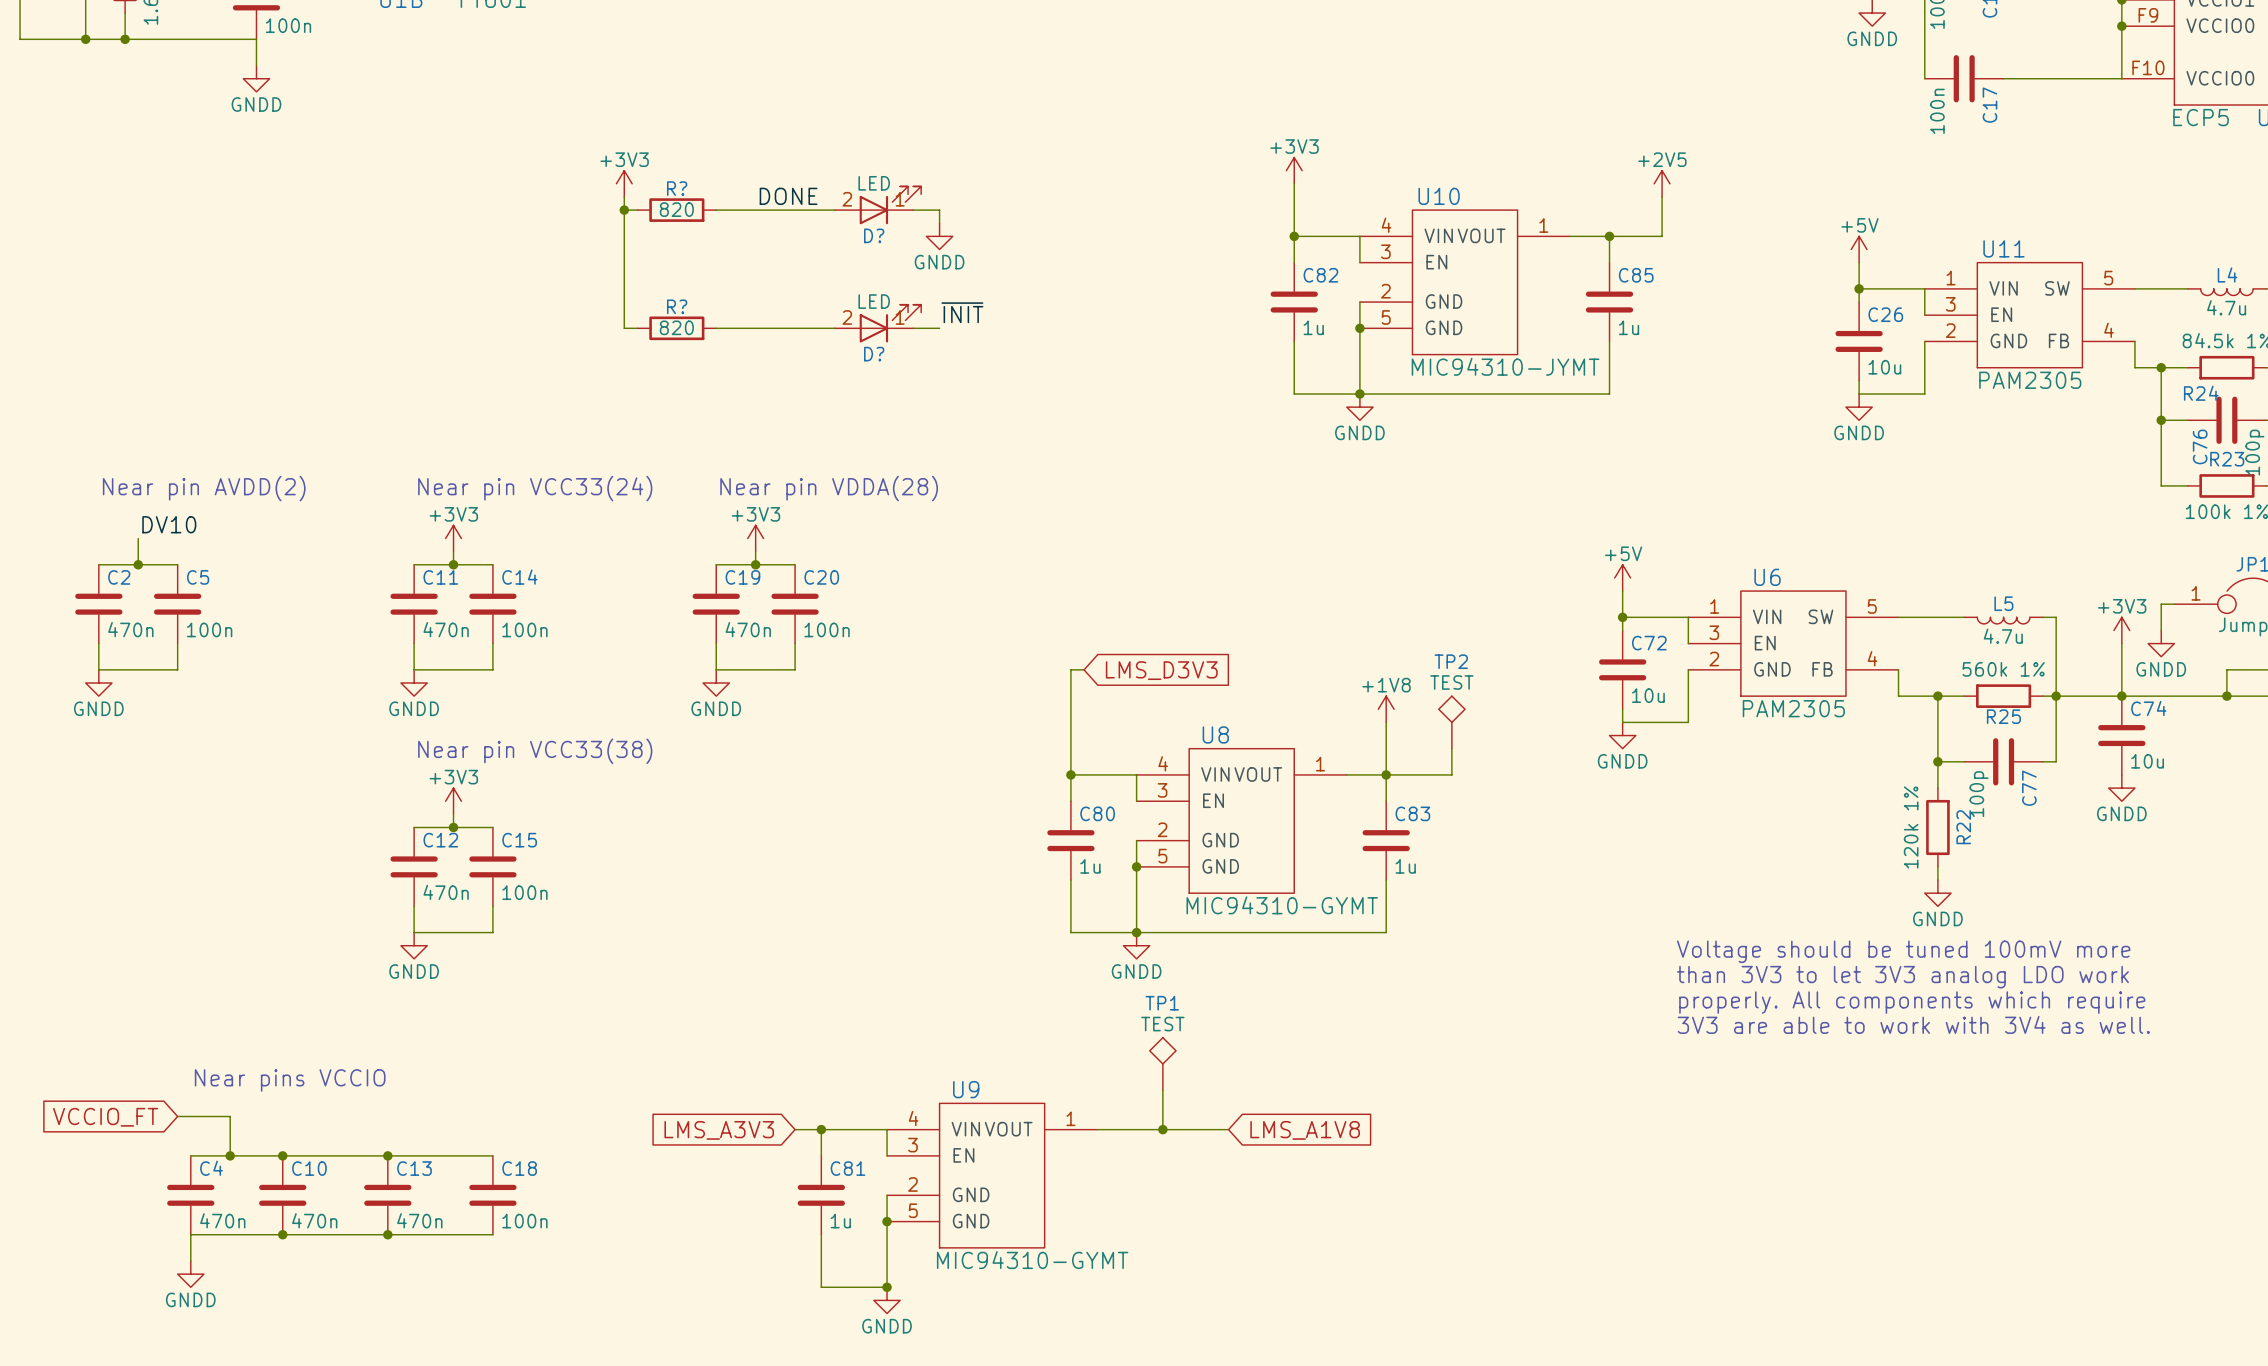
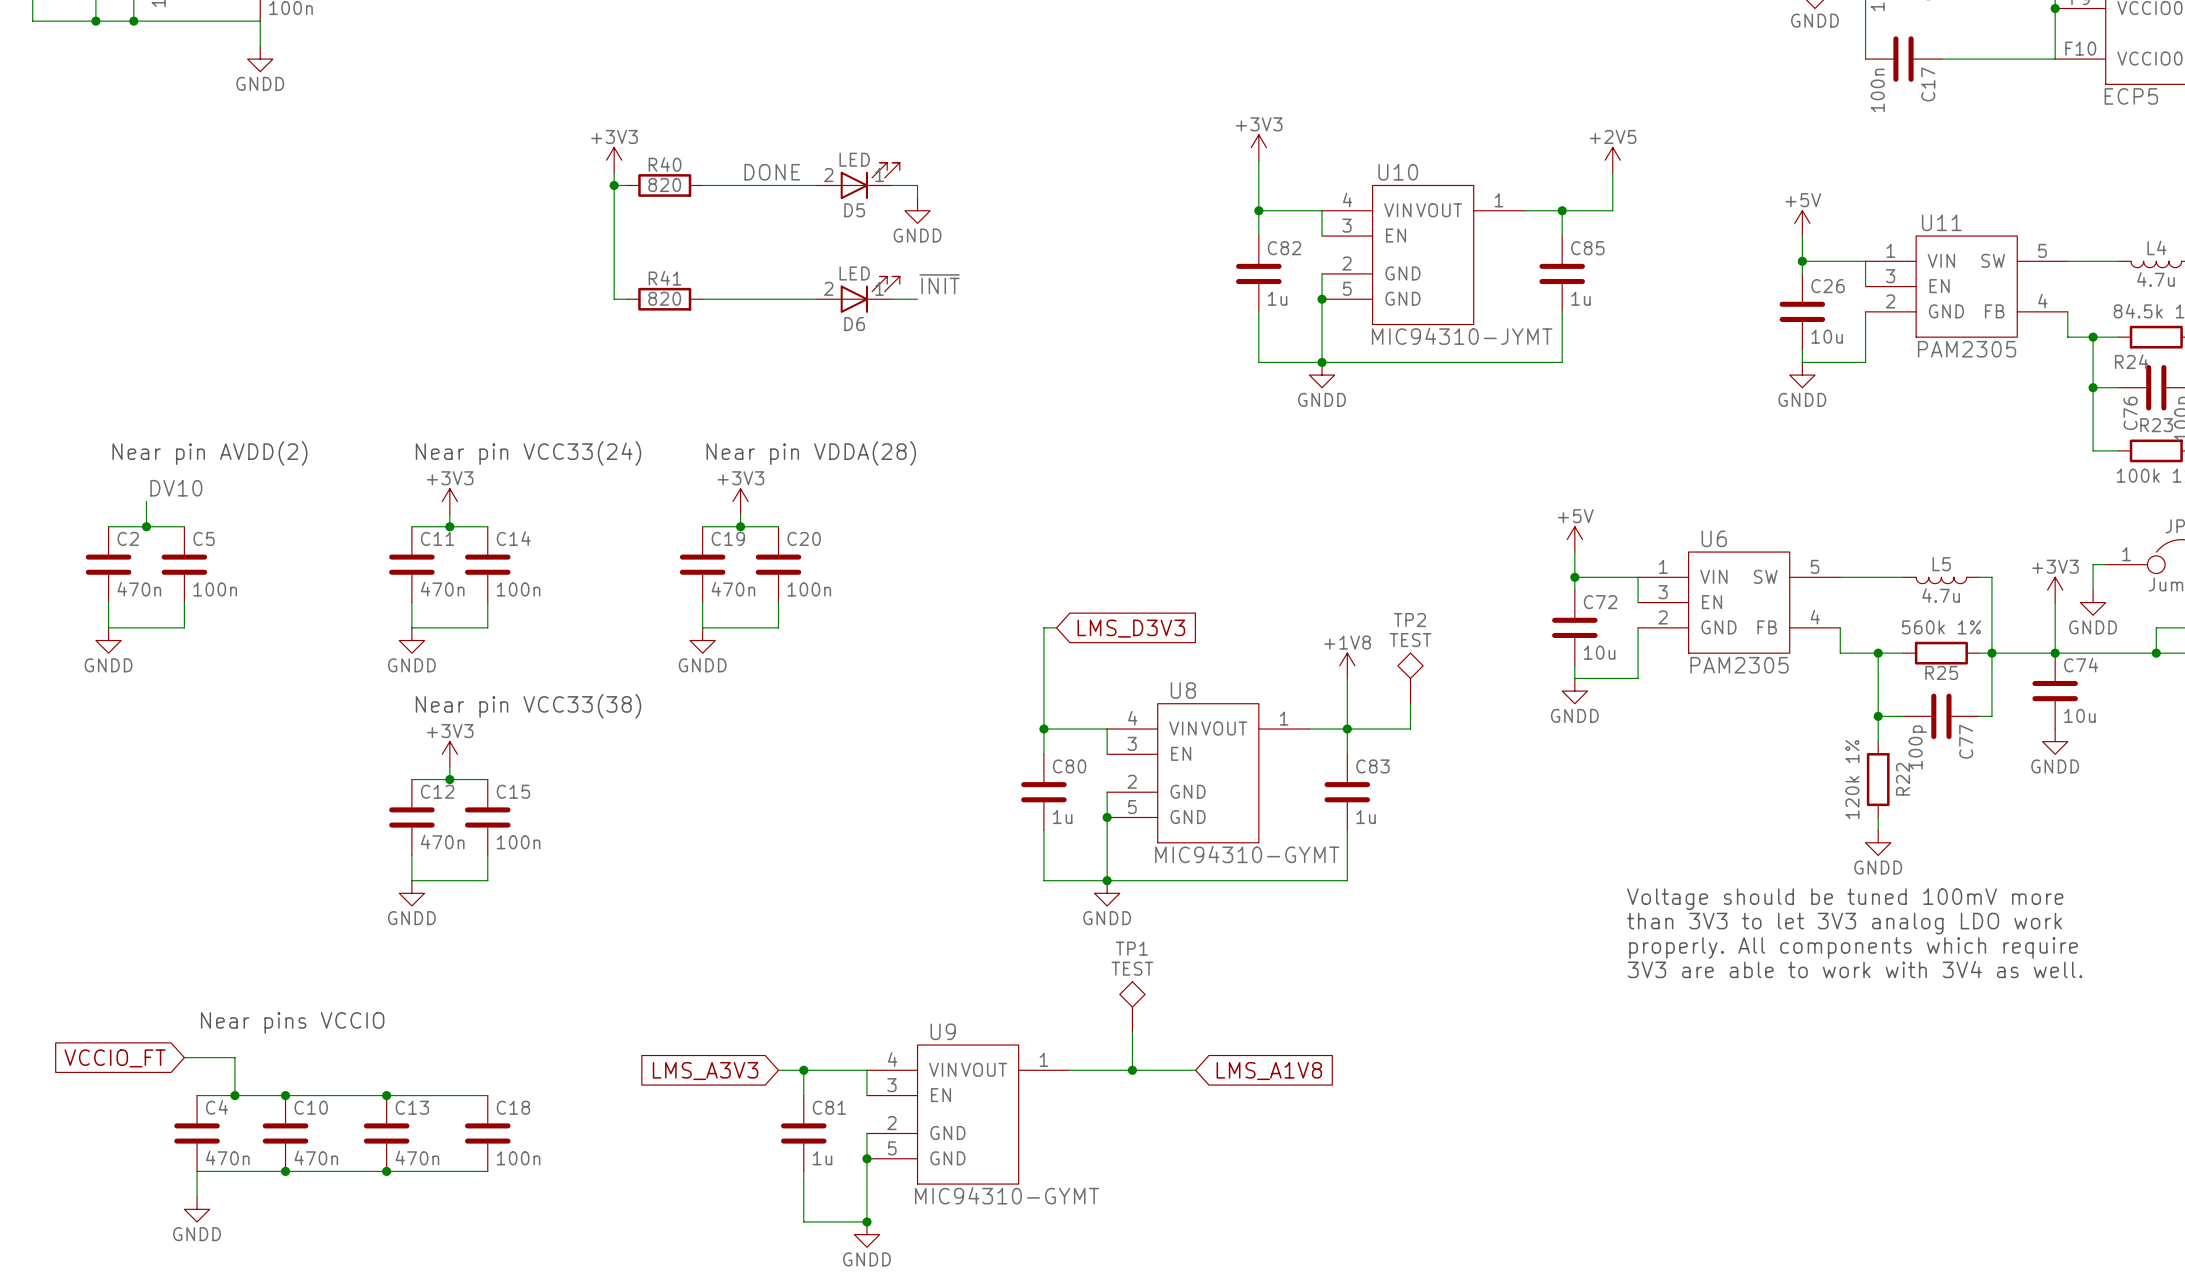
R? name: R? (677, 188) -> R40 (665, 164)
D? name: D? (874, 235) -> D5 (854, 210)
R? name: R? (677, 306) -> R41 (665, 278)
D? name: D? (874, 354) -> D6 (854, 324)

